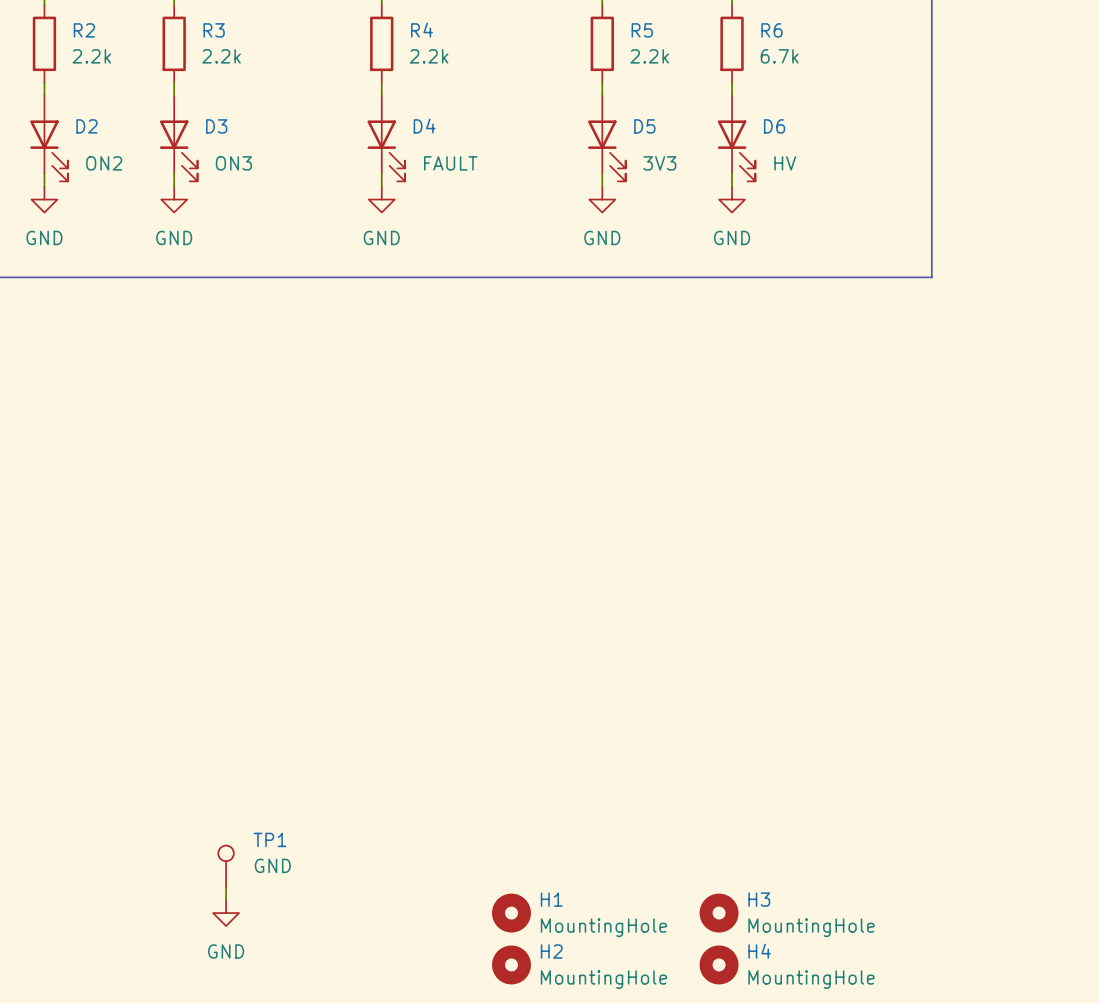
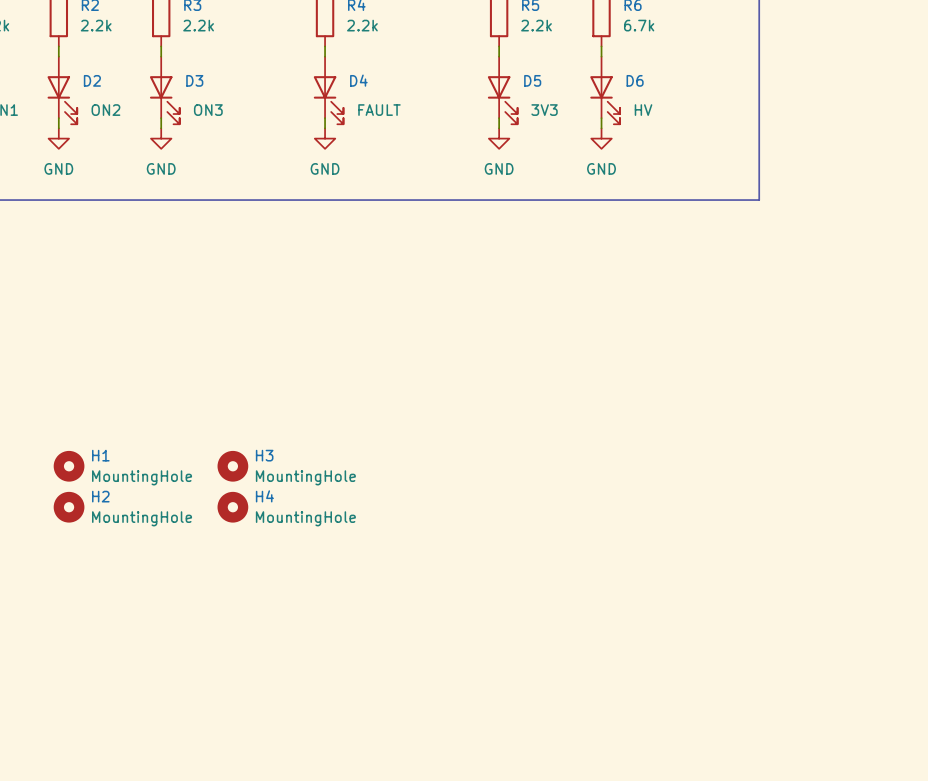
TP1: GND (226, 866) -> none
wire: (226, 887) (226, 900) -> none
power symbol: GND (226, 913) -> none
H1 position: (511, 913) -> (69, 466)
H3 position: (719, 913) -> (232, 466)
H2 position: (511, 964) -> (69, 507)
H4 position: (719, 964) -> (232, 507)

